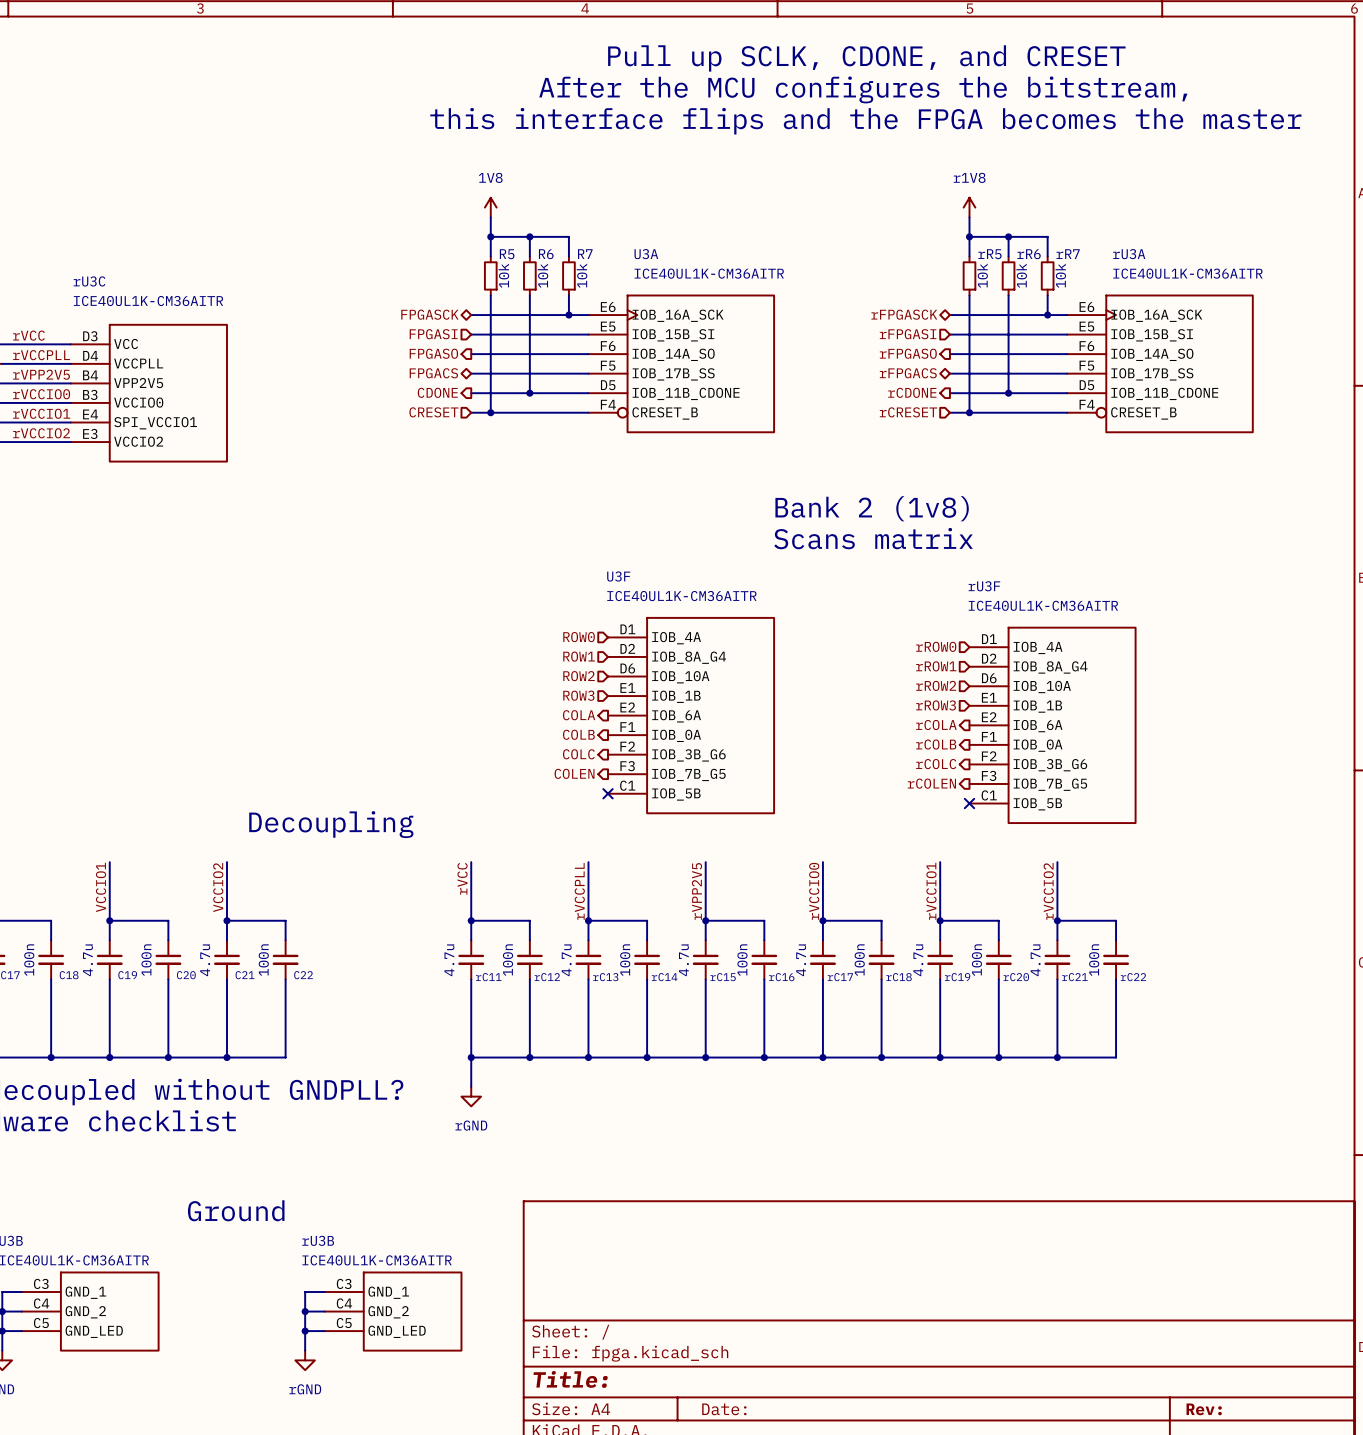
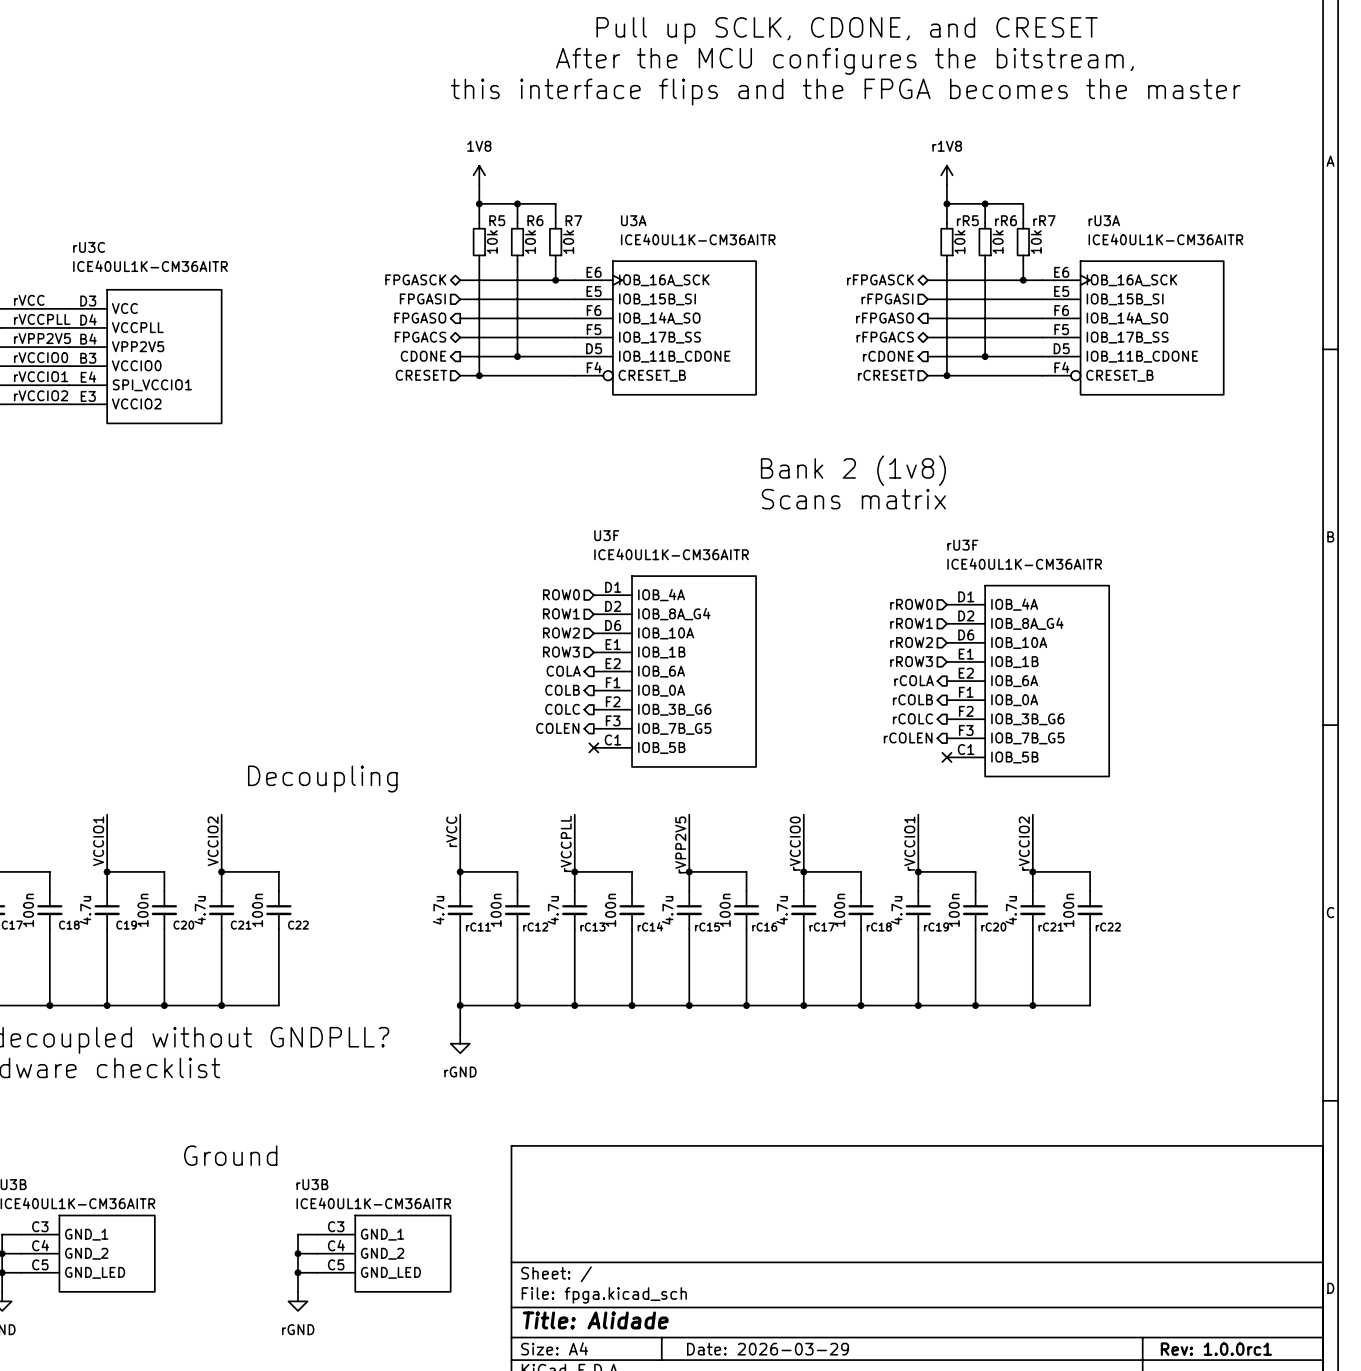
title block: Title: (570, 1379) -> Title: Alidade (595, 1320)
title block: Date: (724, 1409) -> Date: 2026-03-29 (768, 1349)
title block: Rev: (1204, 1409) -> Rev: 1.0.0rc1 (1216, 1349)

